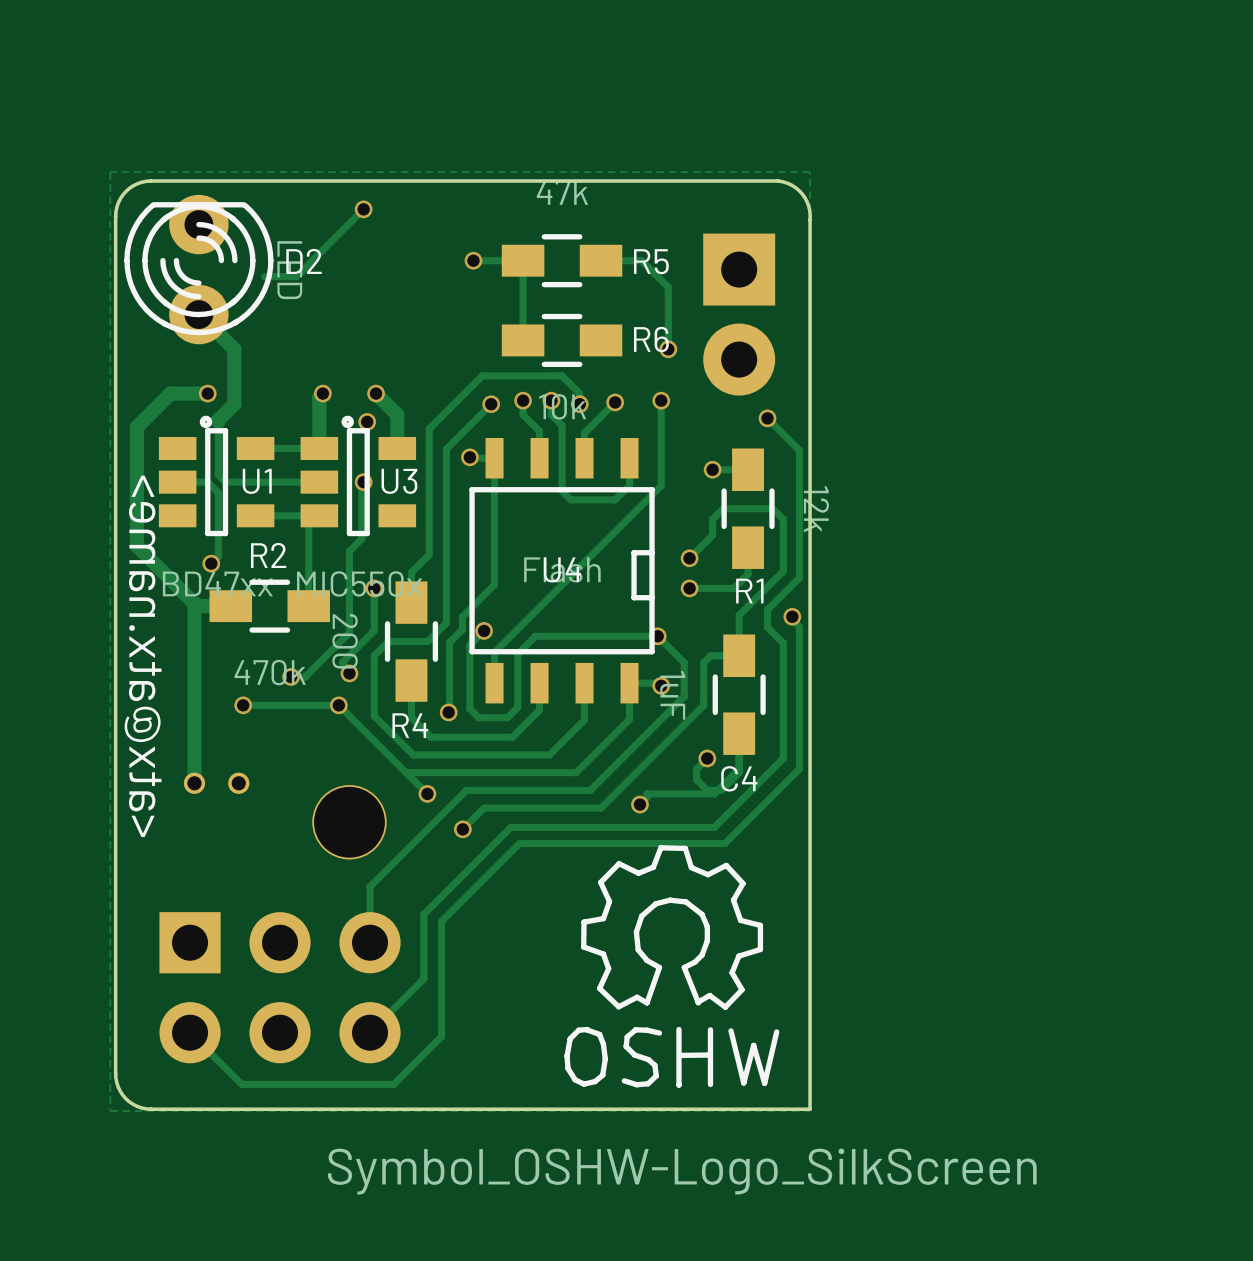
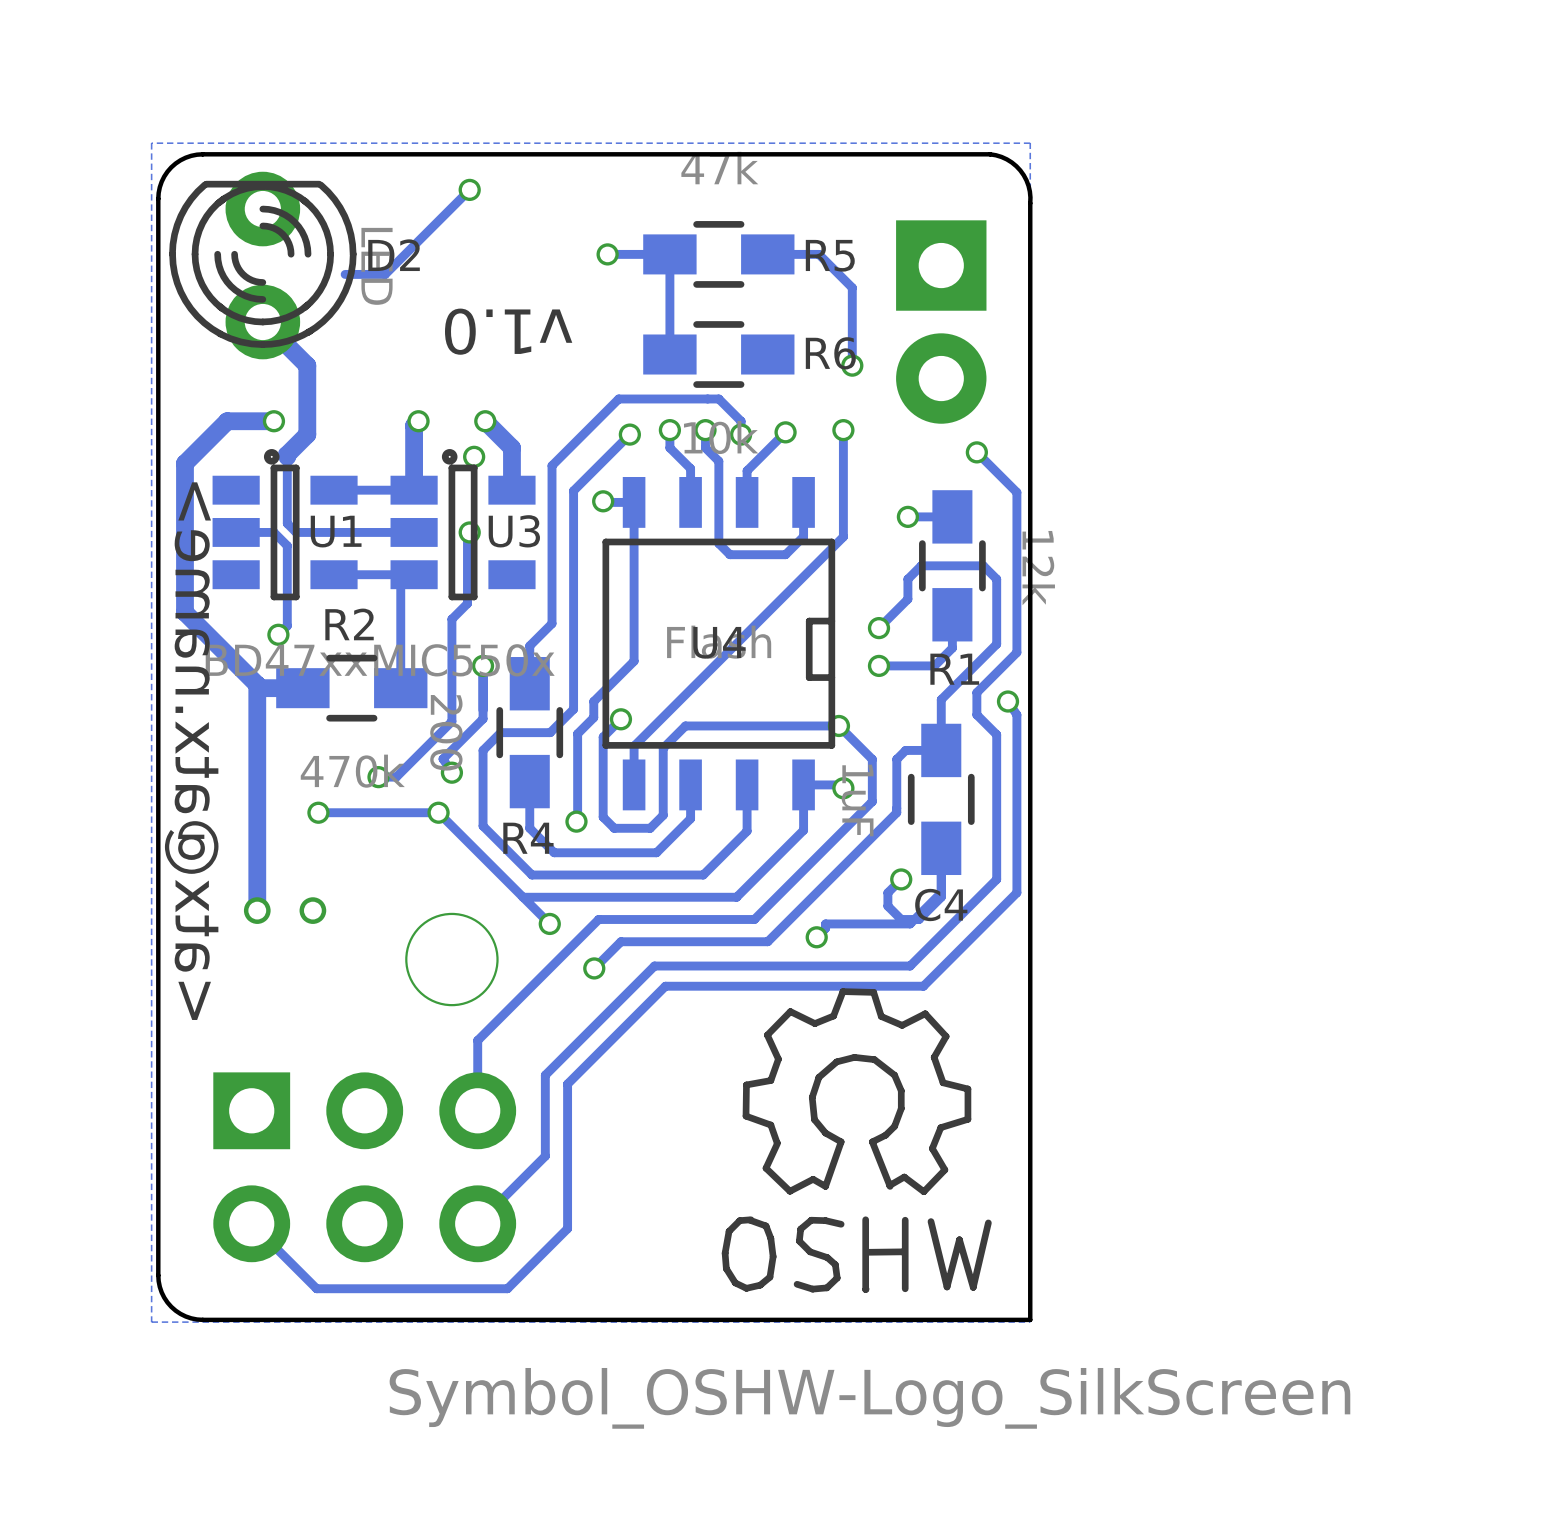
text: none -> v1.0 (508, 331)

